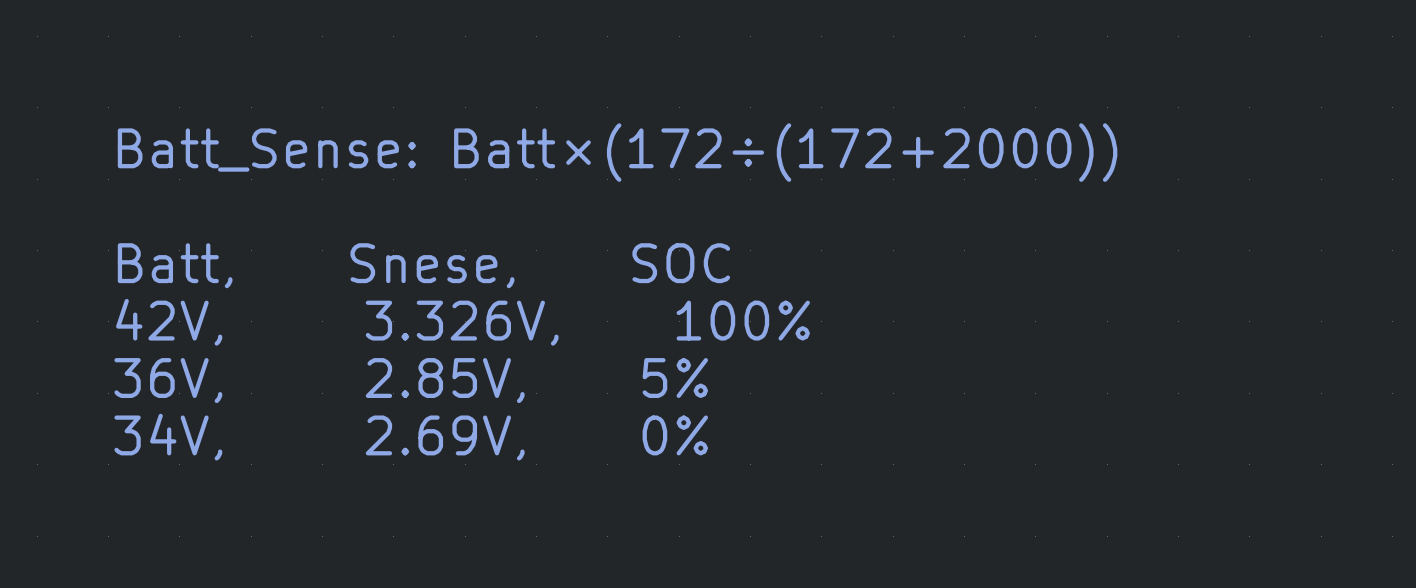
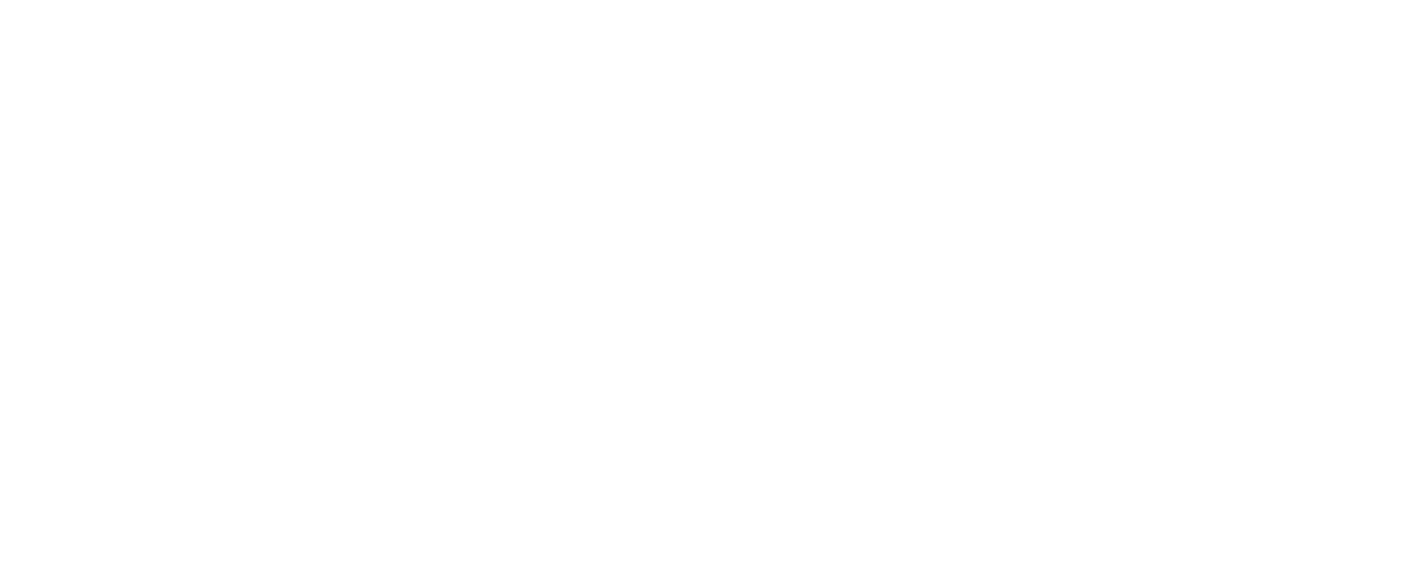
text: Batt_Sense: Batt×(172÷(172+2000)) (617, 152) -> none
text: Batt, Snese, SOC (423, 265) -> none
text: 42V, 3.326V, 100% (463, 322) -> none
text: 36V, 2.85V, 5% (411, 380) -> none
text: 34V, 2.69V, 0% (411, 437) -> none

